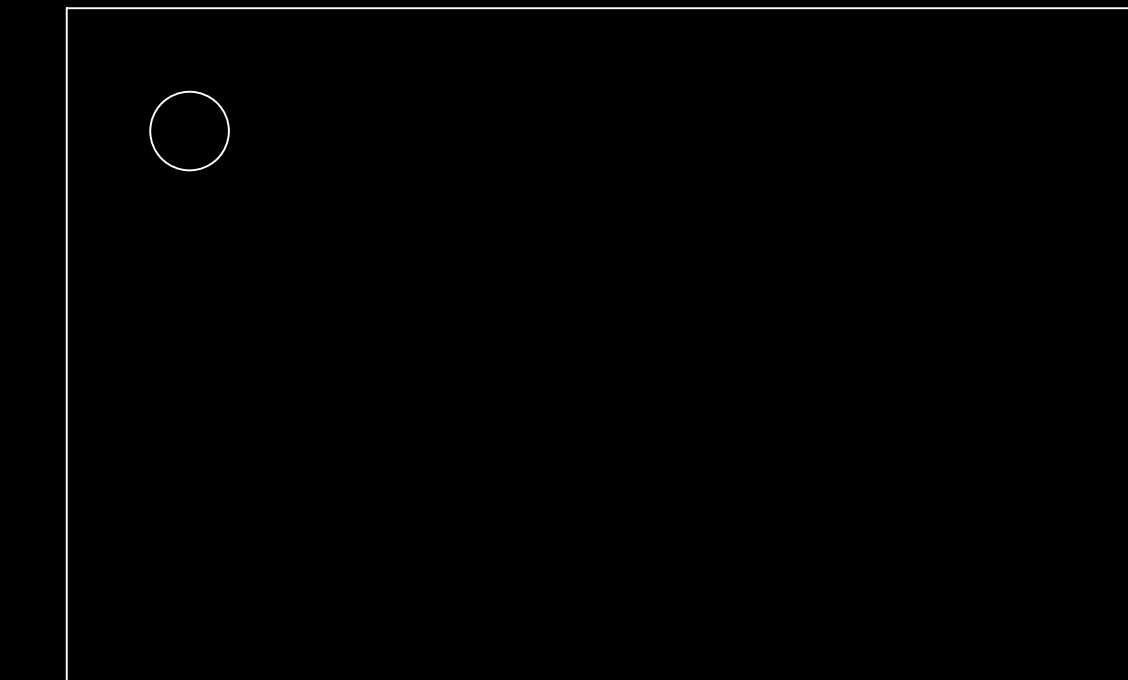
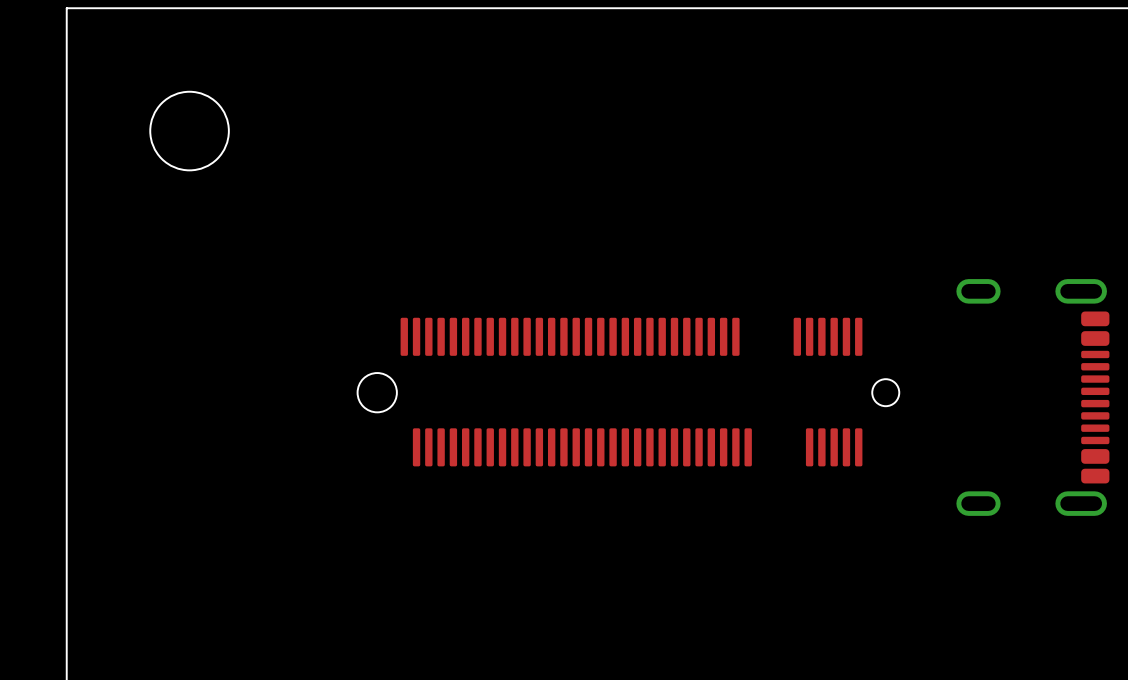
part: none -> (628, 392)
part: none -> (1032, 397)

